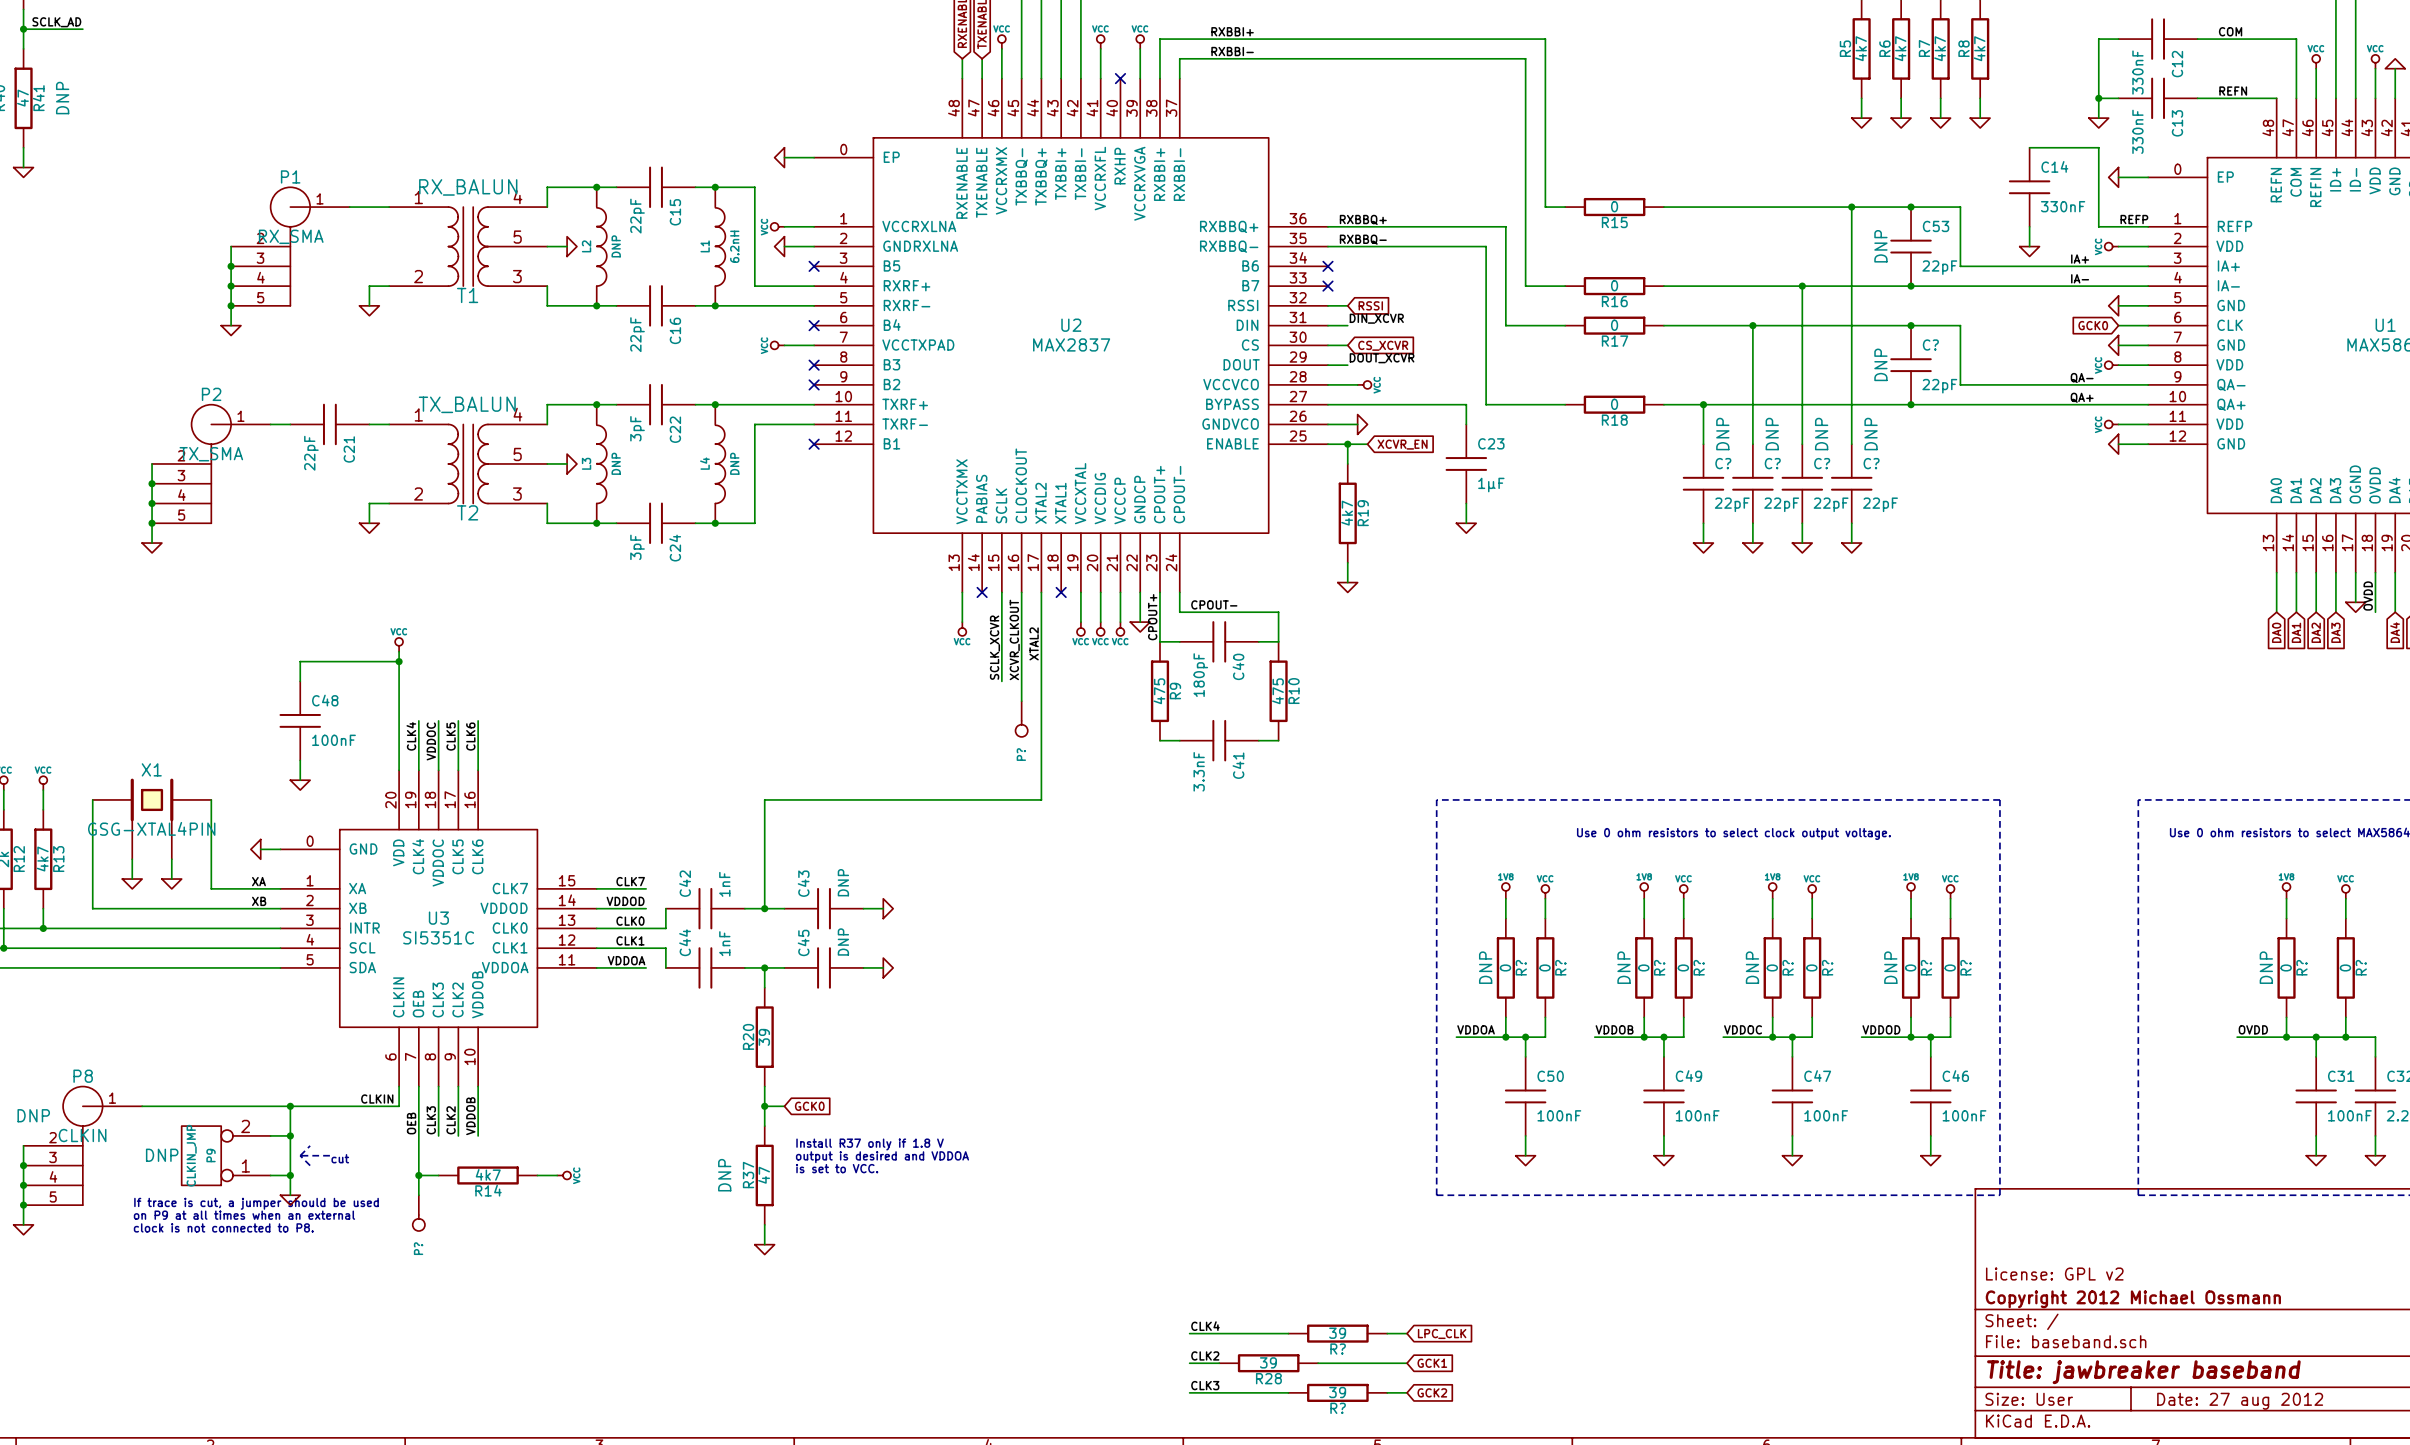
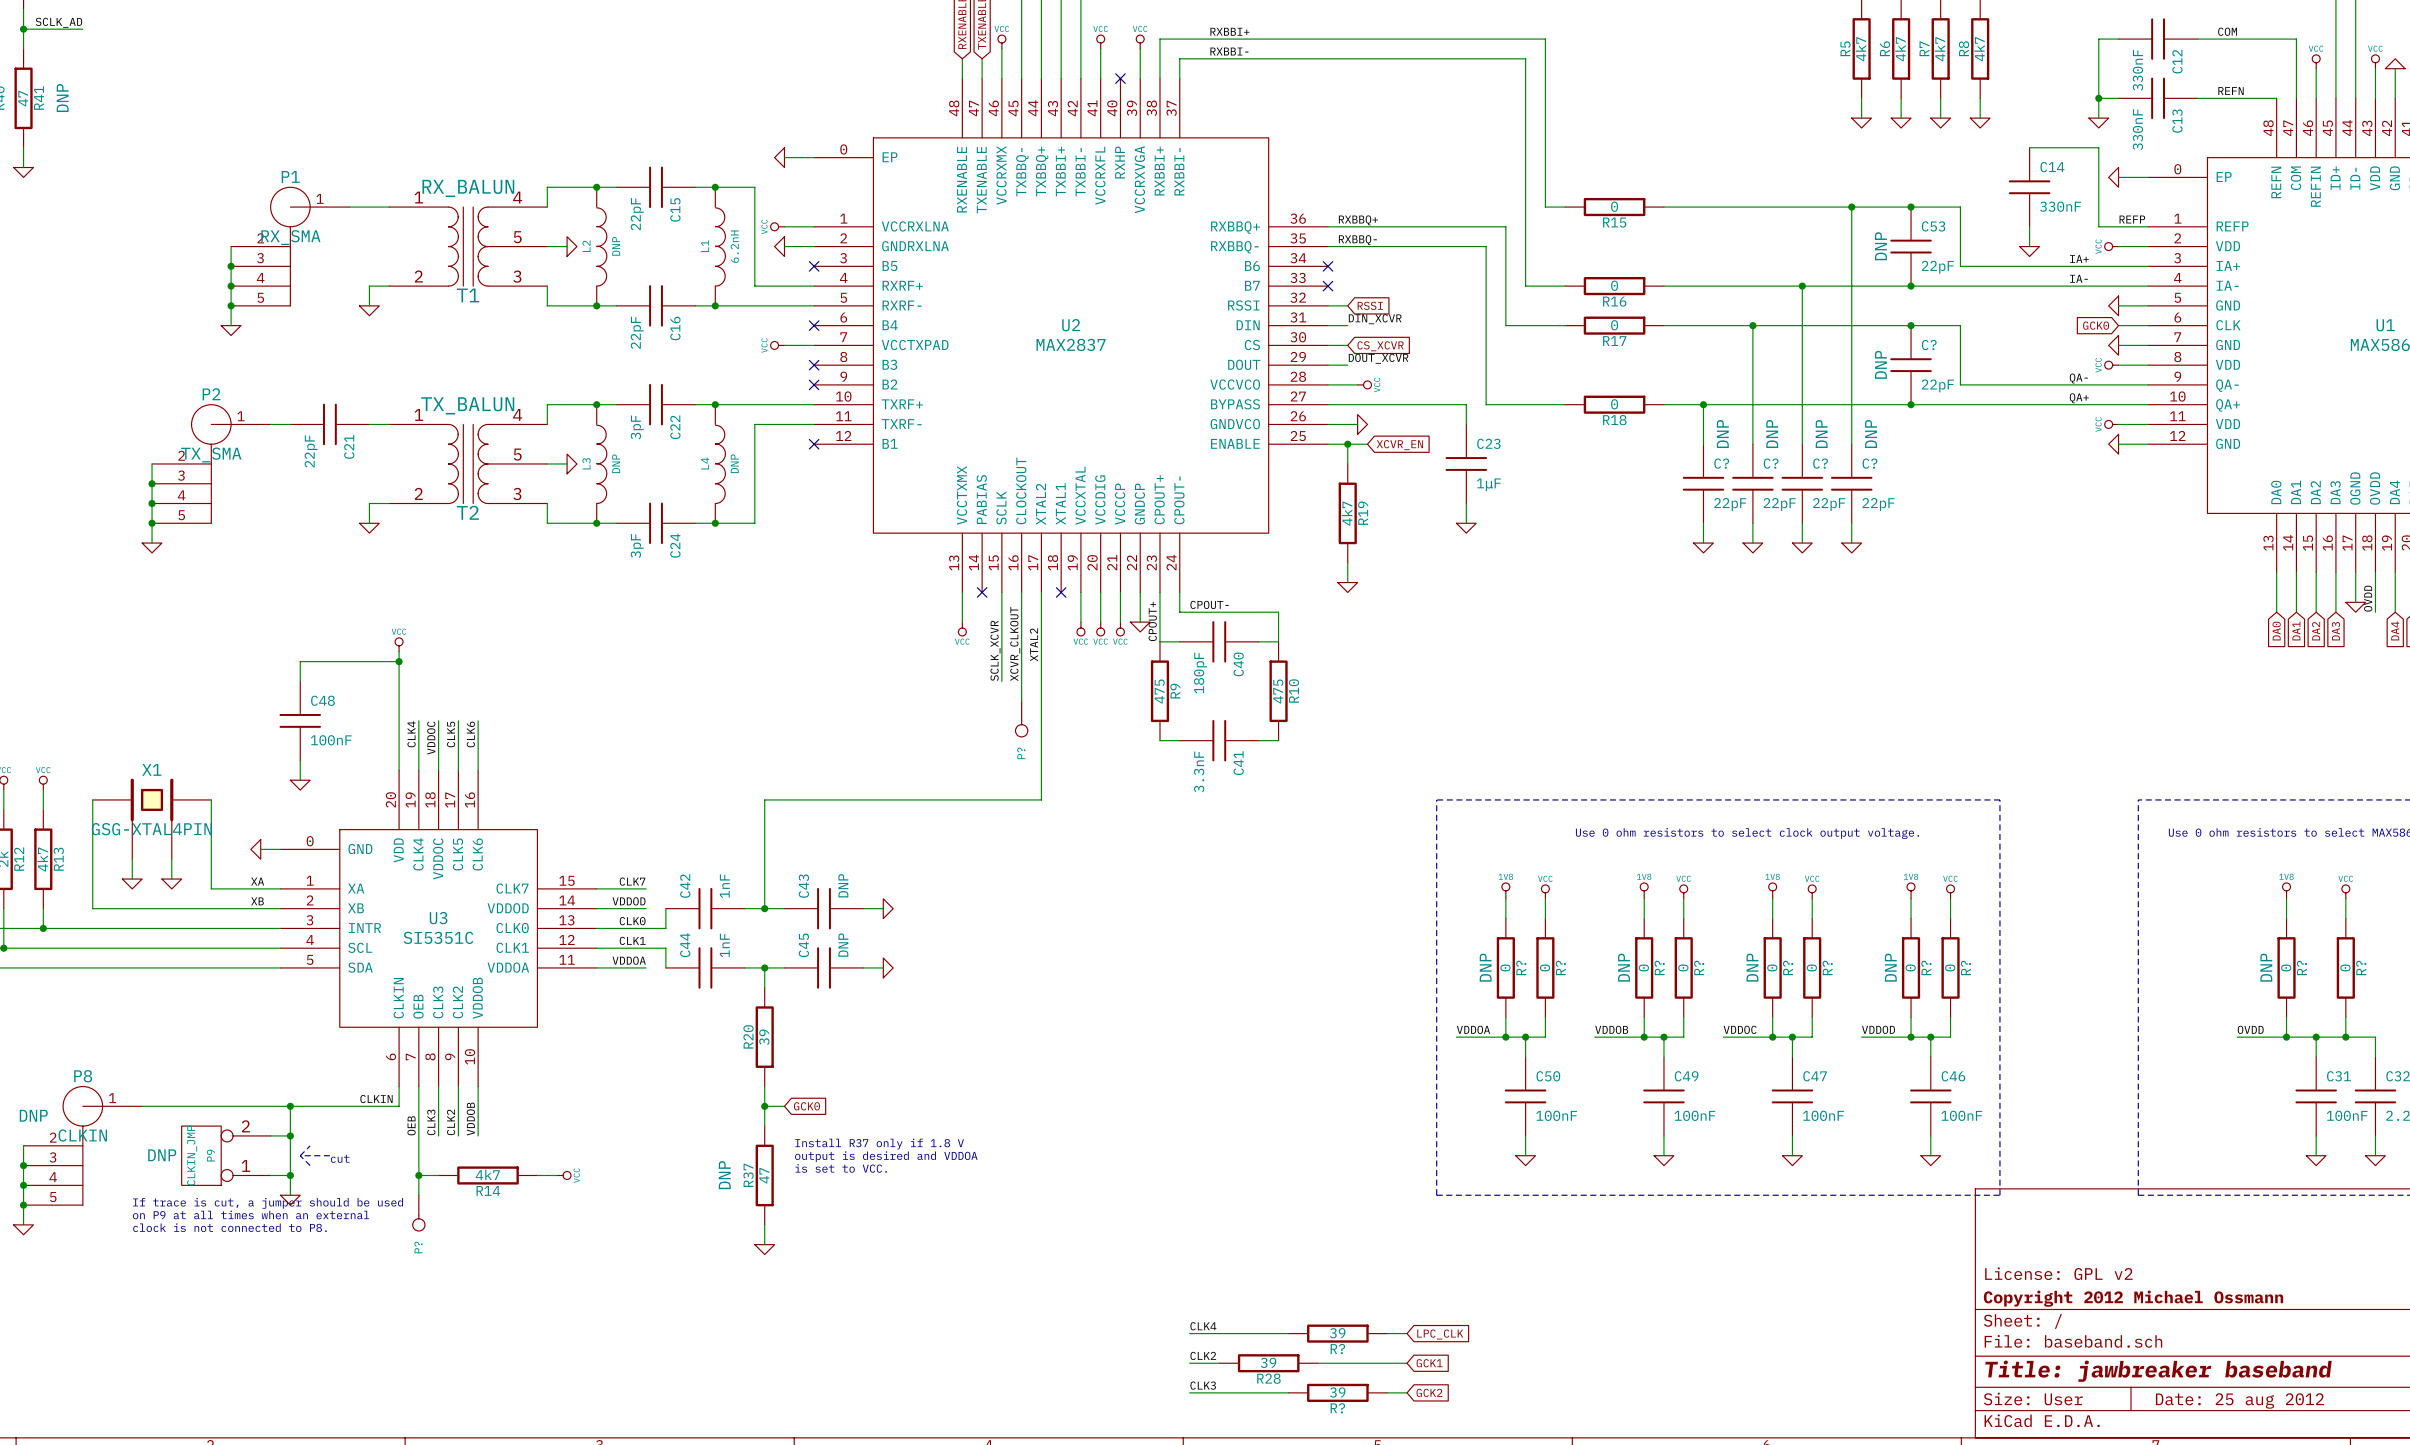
title block: Date: 27 aug 2012 (2240, 1401) -> Date: 25 aug 2012 (2239, 1400)

